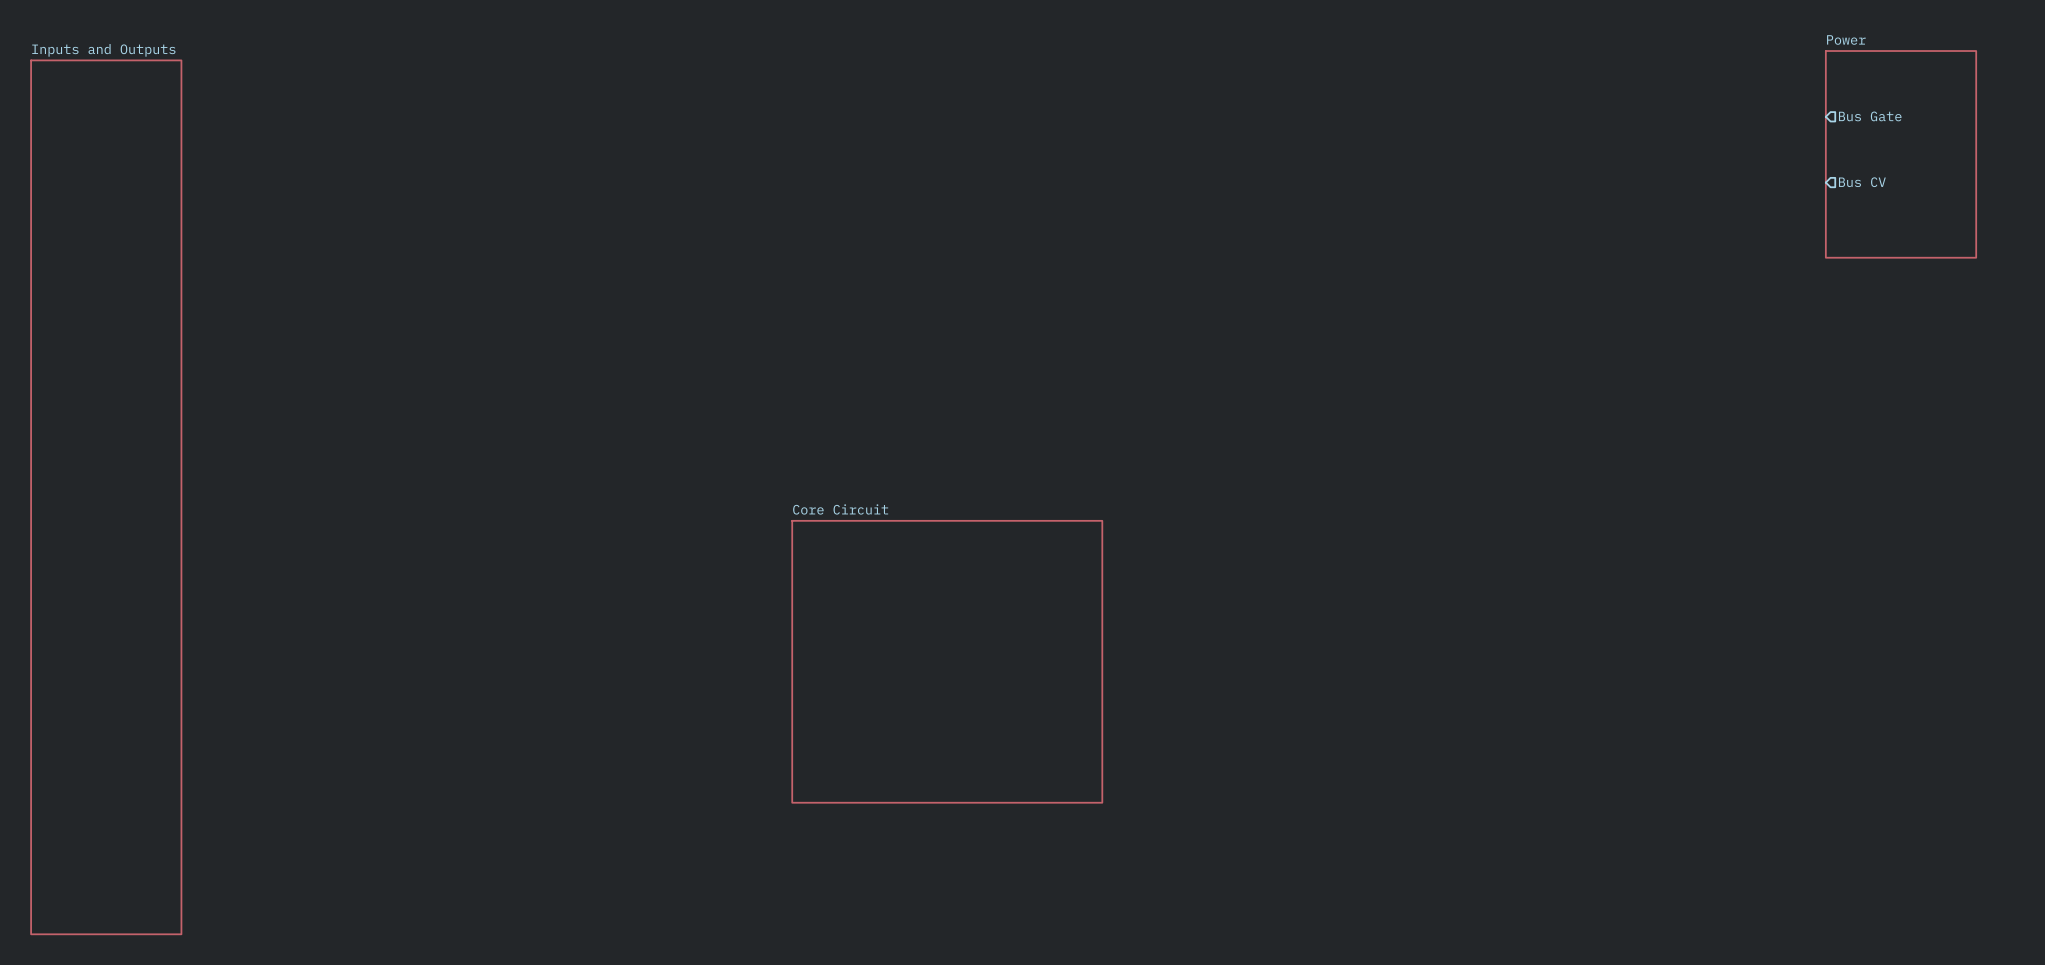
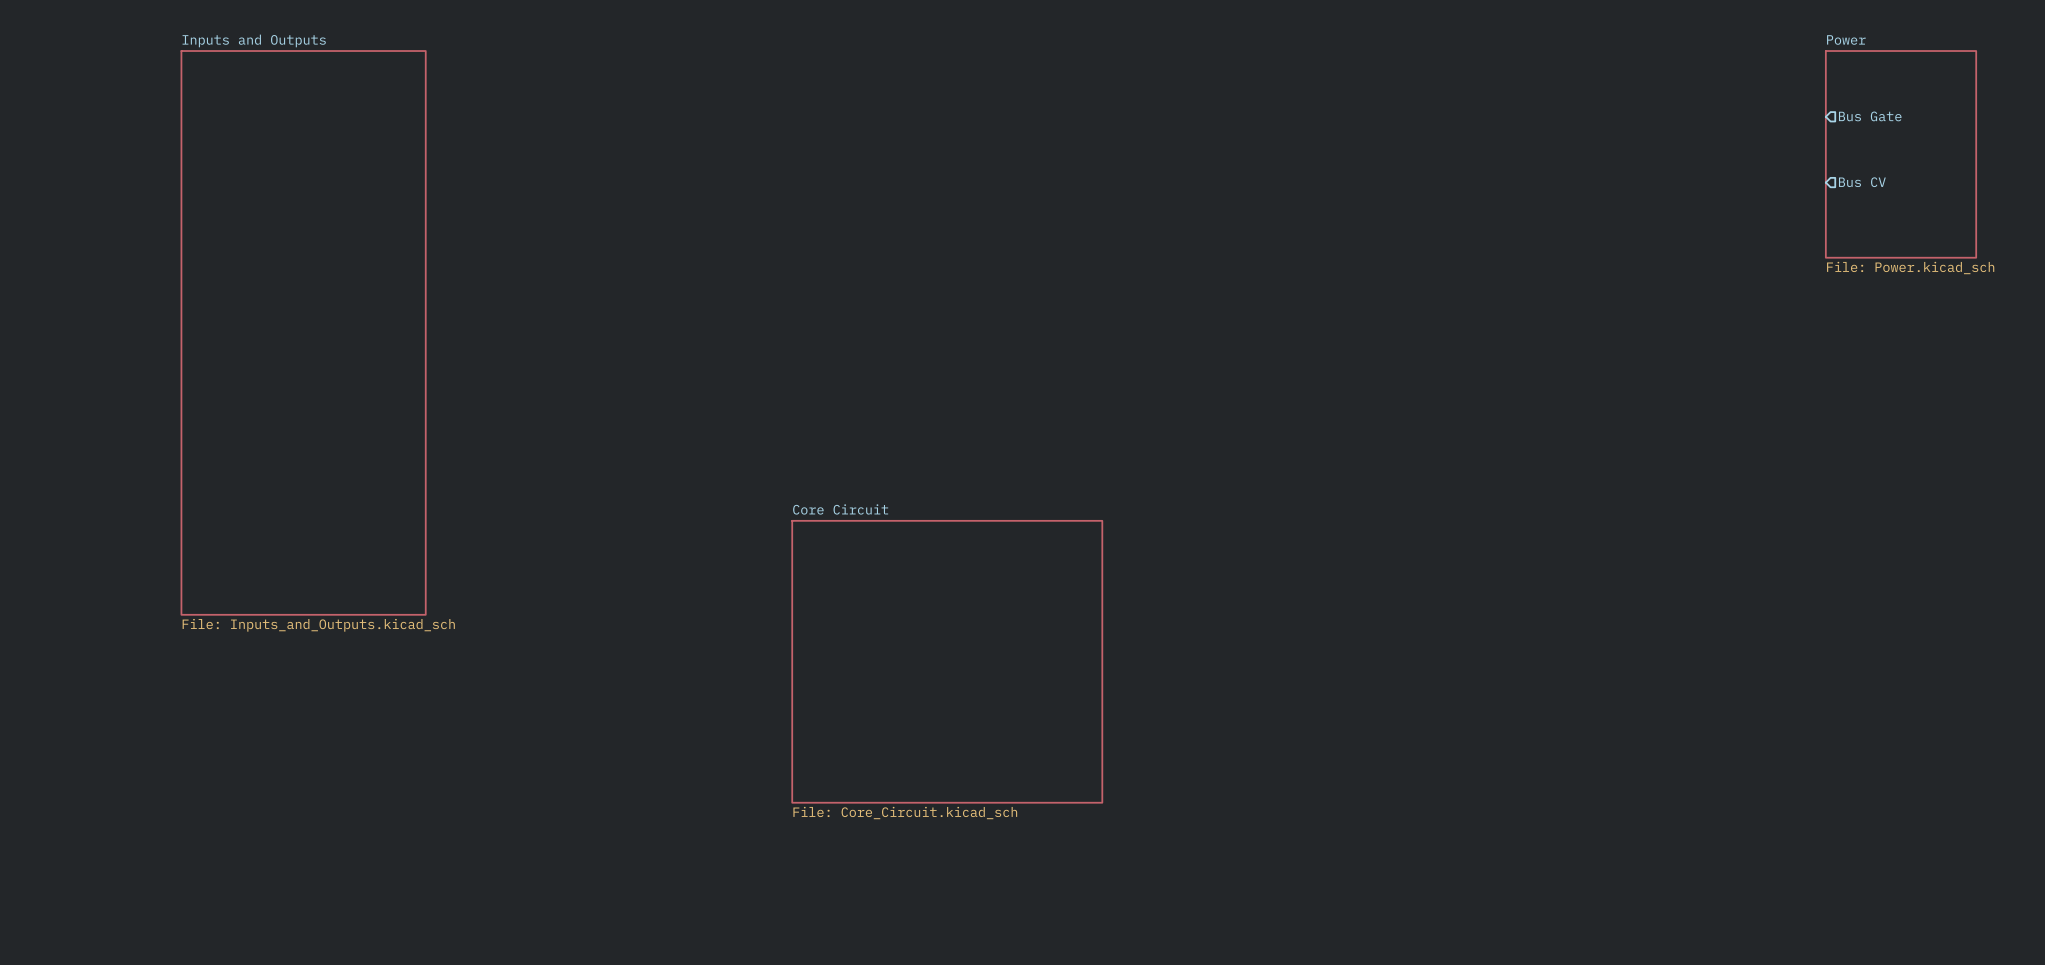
sheet Power value: none -> File: Power.kicad_sch (1910, 268)
sheet Inputs and Outputs: none -> File: Inputs_and_Outputs.kicad_sch (303, 332)
sheet Inputs and Outputs: (106, 497) -> none
sheet Core Circuit value: none -> File: Core_Circuit.kicad_sch (905, 813)

